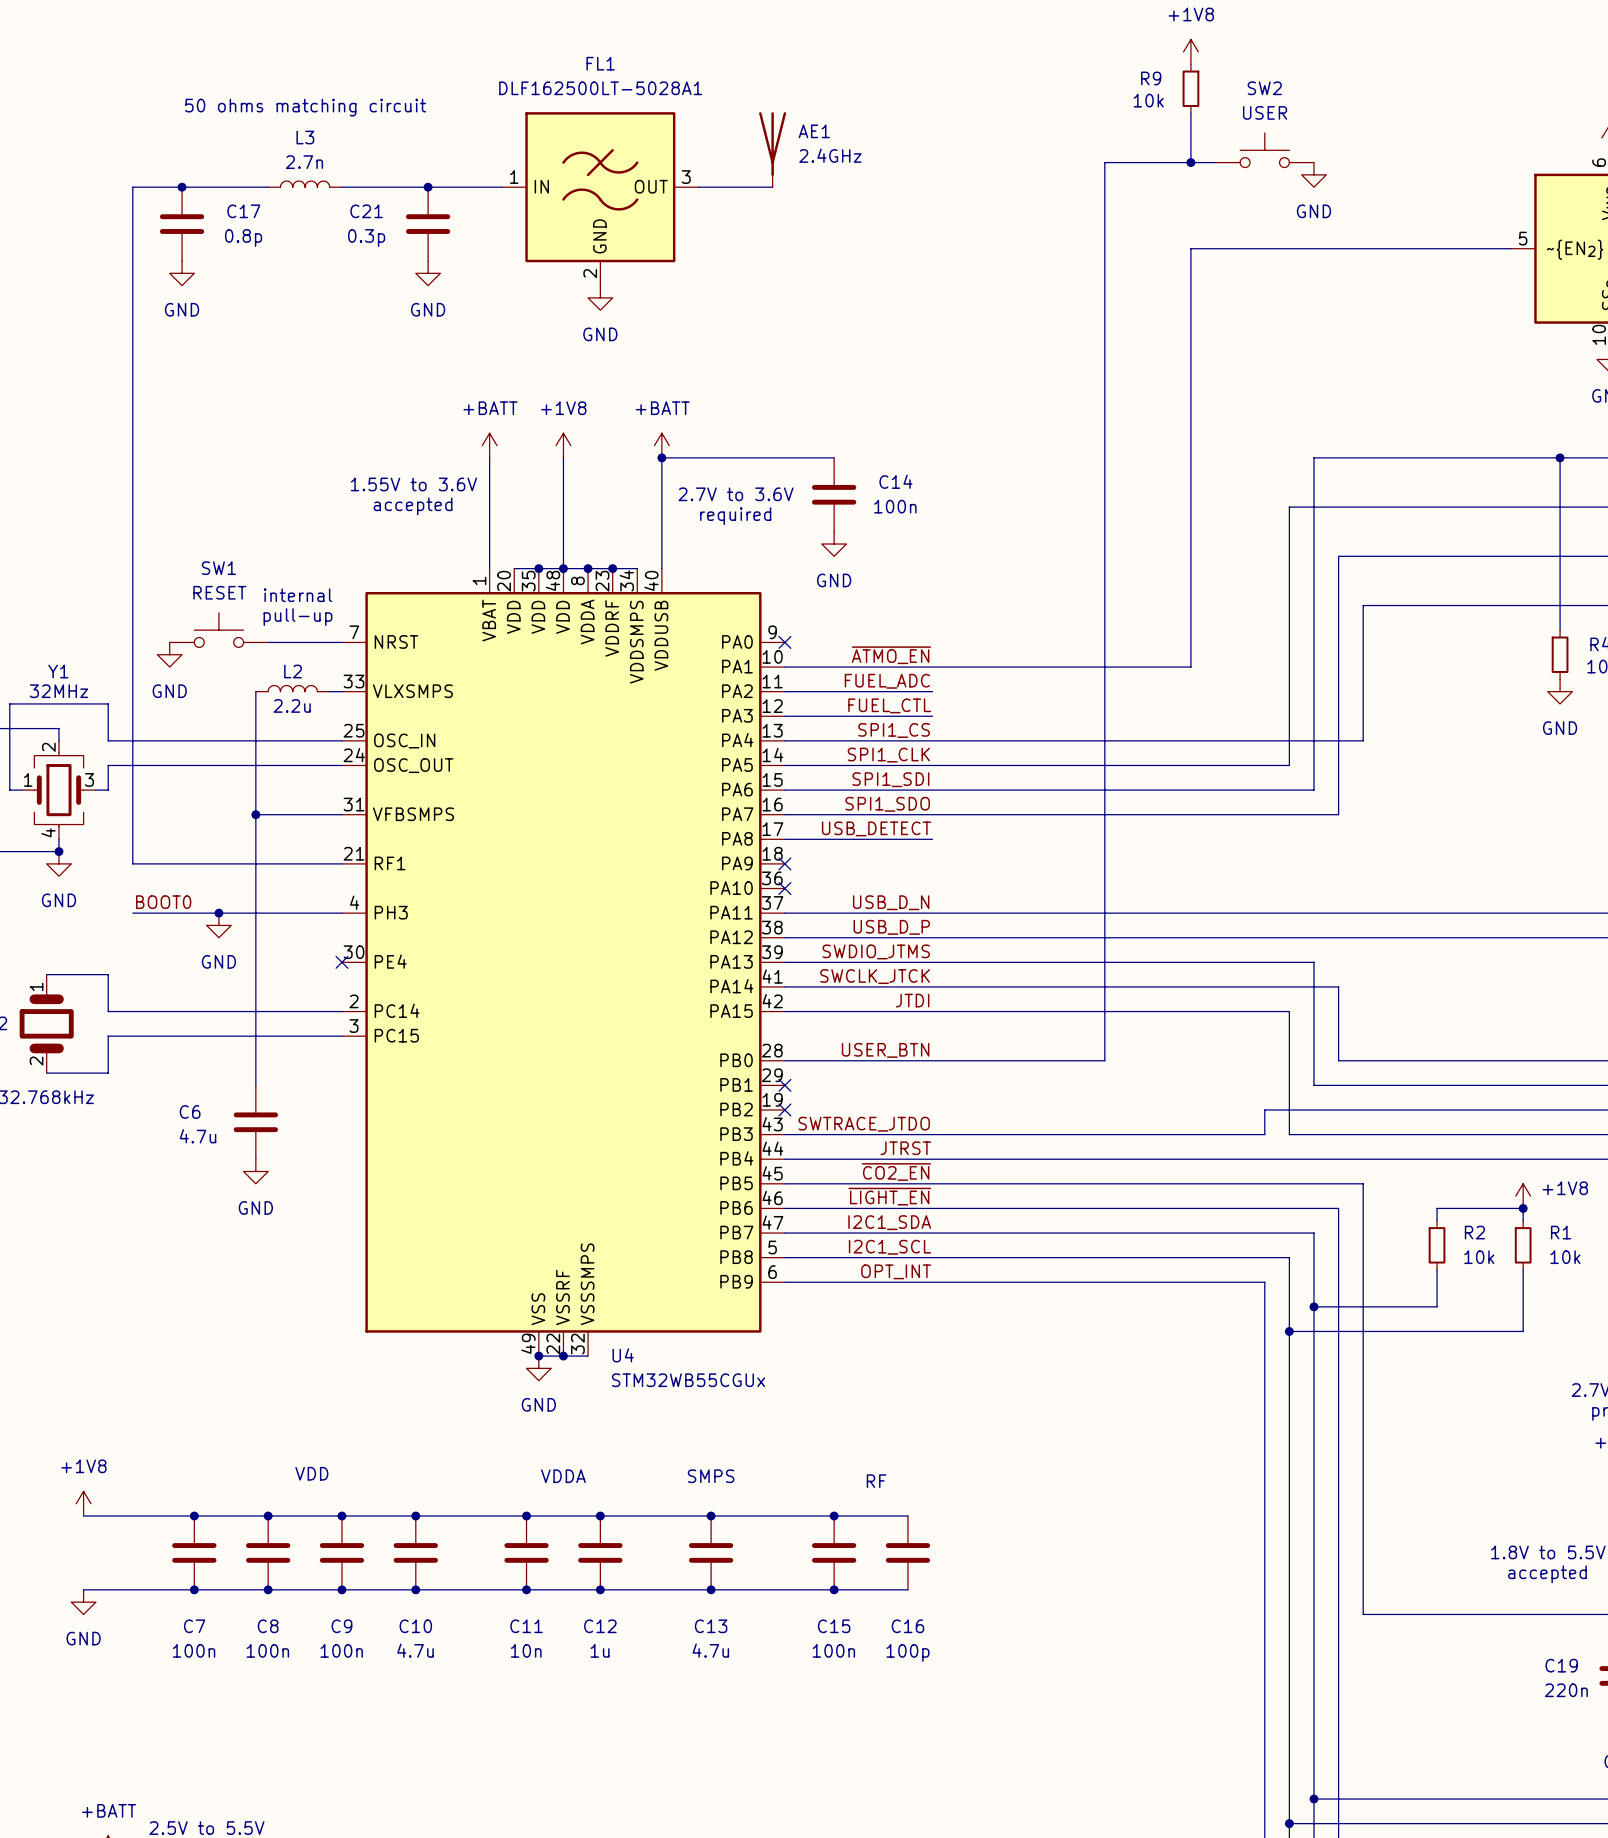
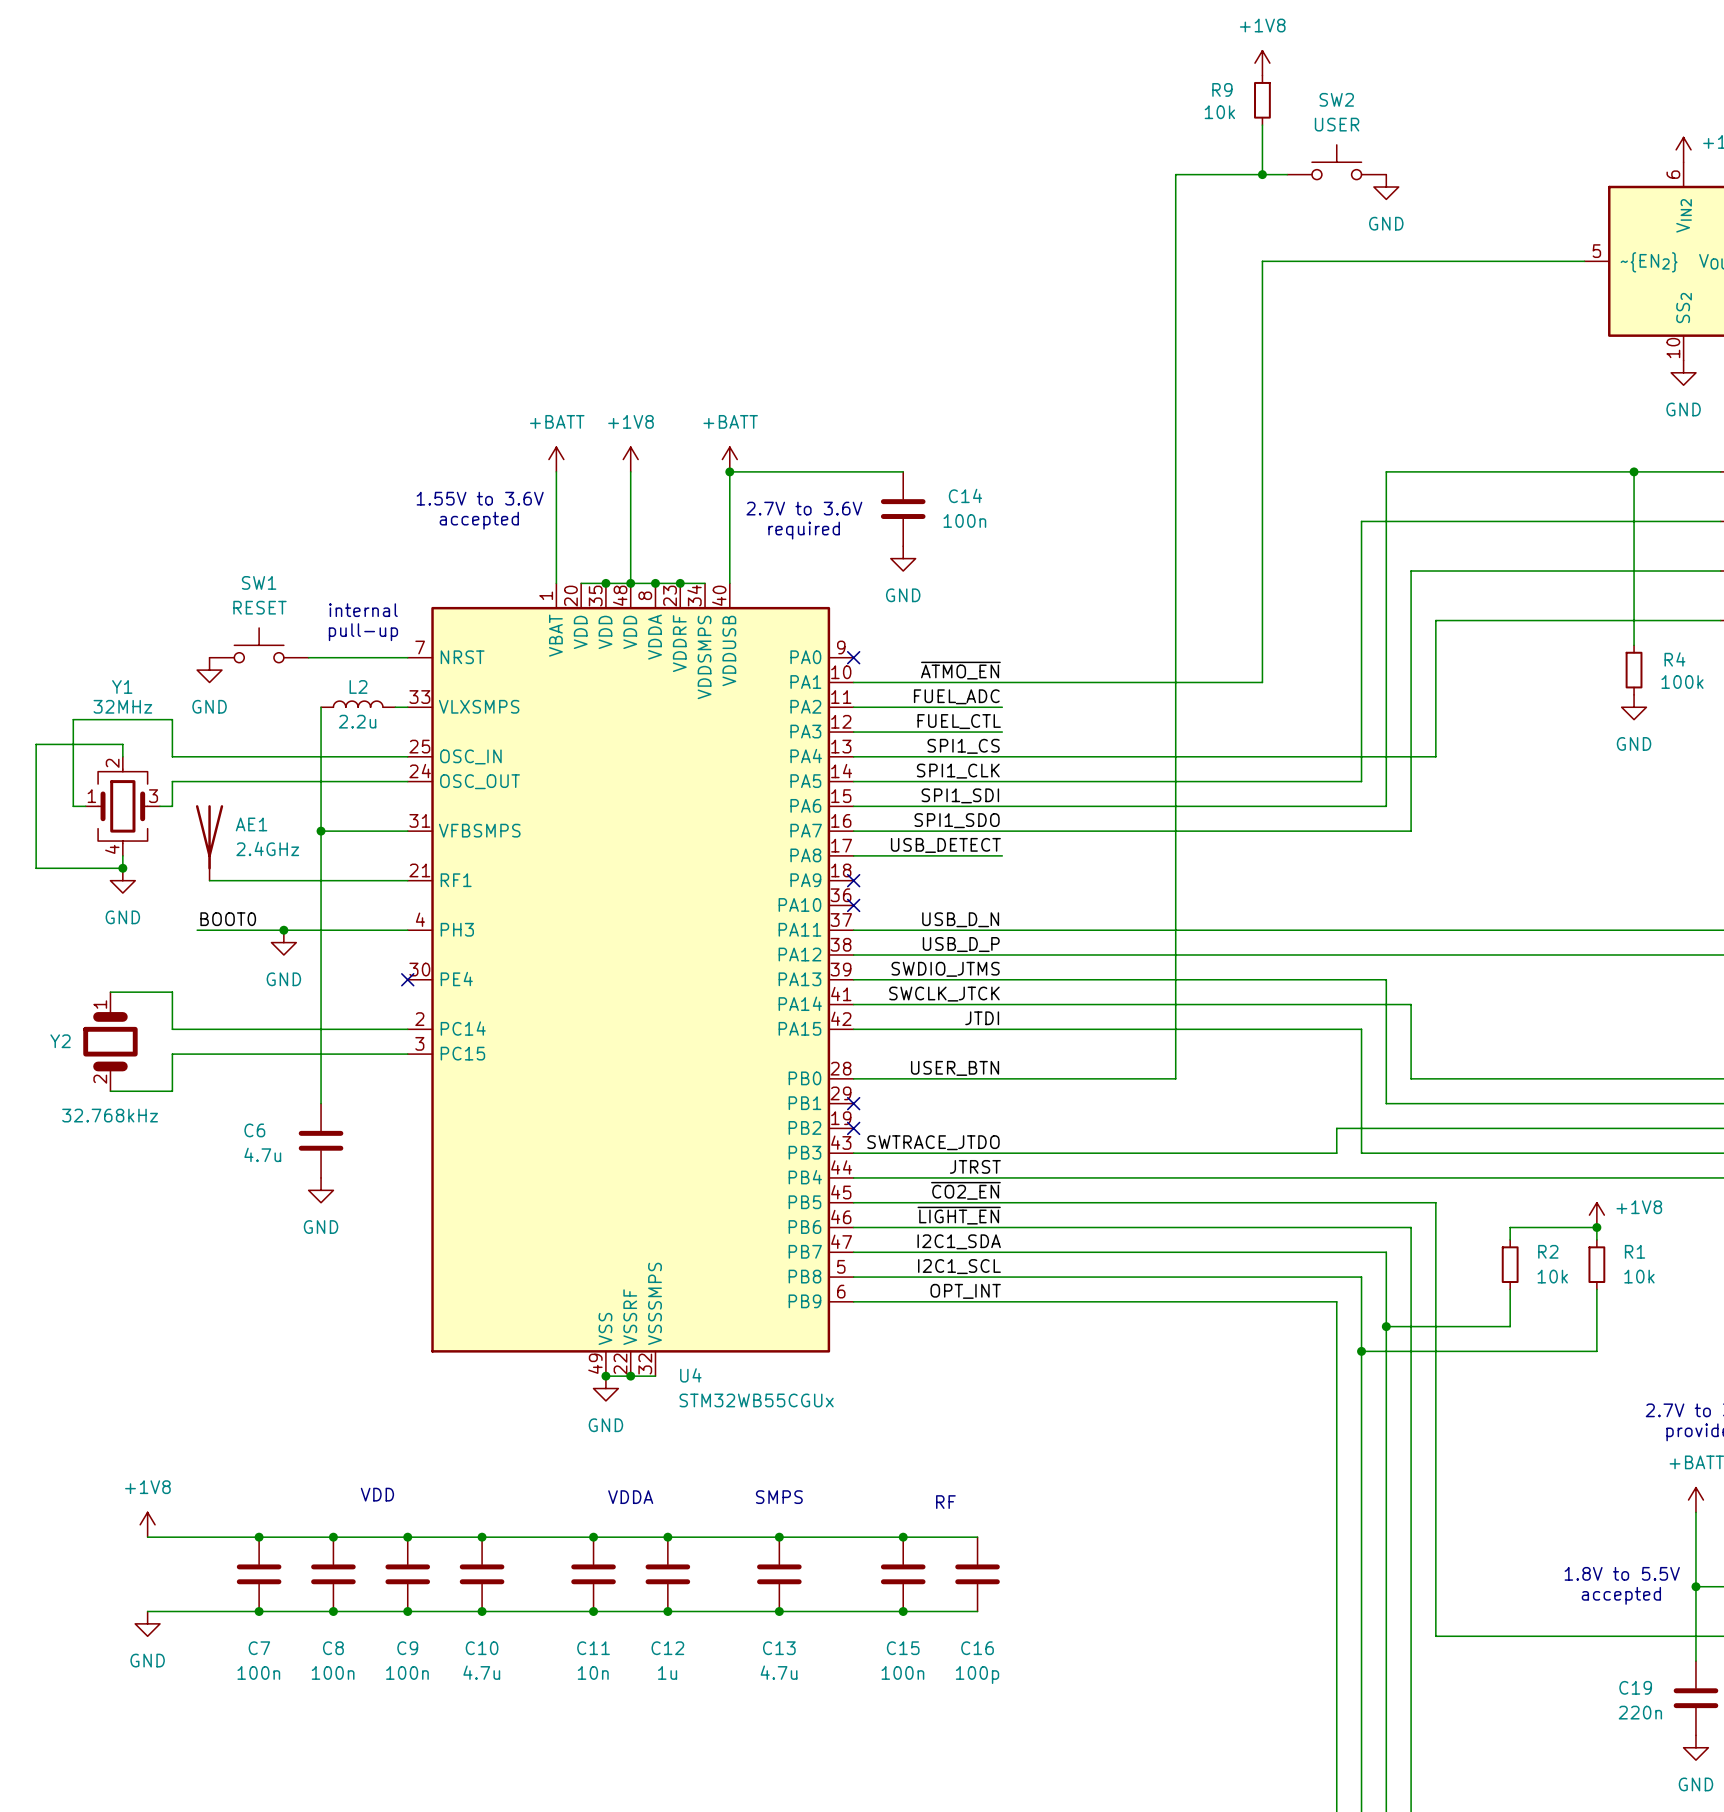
text: 50 ohms matching circuit (305, 107) -> none
AE1 position: (772, 149) -> (209, 842)
L3: 2.7n (305, 184) -> none
junction: (182, 187) -> none
wire: (268, 187) (132, 187) (132, 863) (145, 863) -> none
wire: (341, 187) (501, 187) -> none
junction: (428, 187) -> none
wire: (698, 187) (772, 187) -> none
FL1: DLF162500LT-5028A1 (600, 198) -> none
C17: 0.8p (182, 224) -> none
C21: 0.3p (428, 224) -> none
power symbol: GND (182, 273) -> none
power symbol: GND (428, 273) -> none
power symbol: GND (600, 297) -> none
SW1 position: (218, 630) -> (259, 645)
power symbol position: GND (169, 654) -> GND (209, 670)

